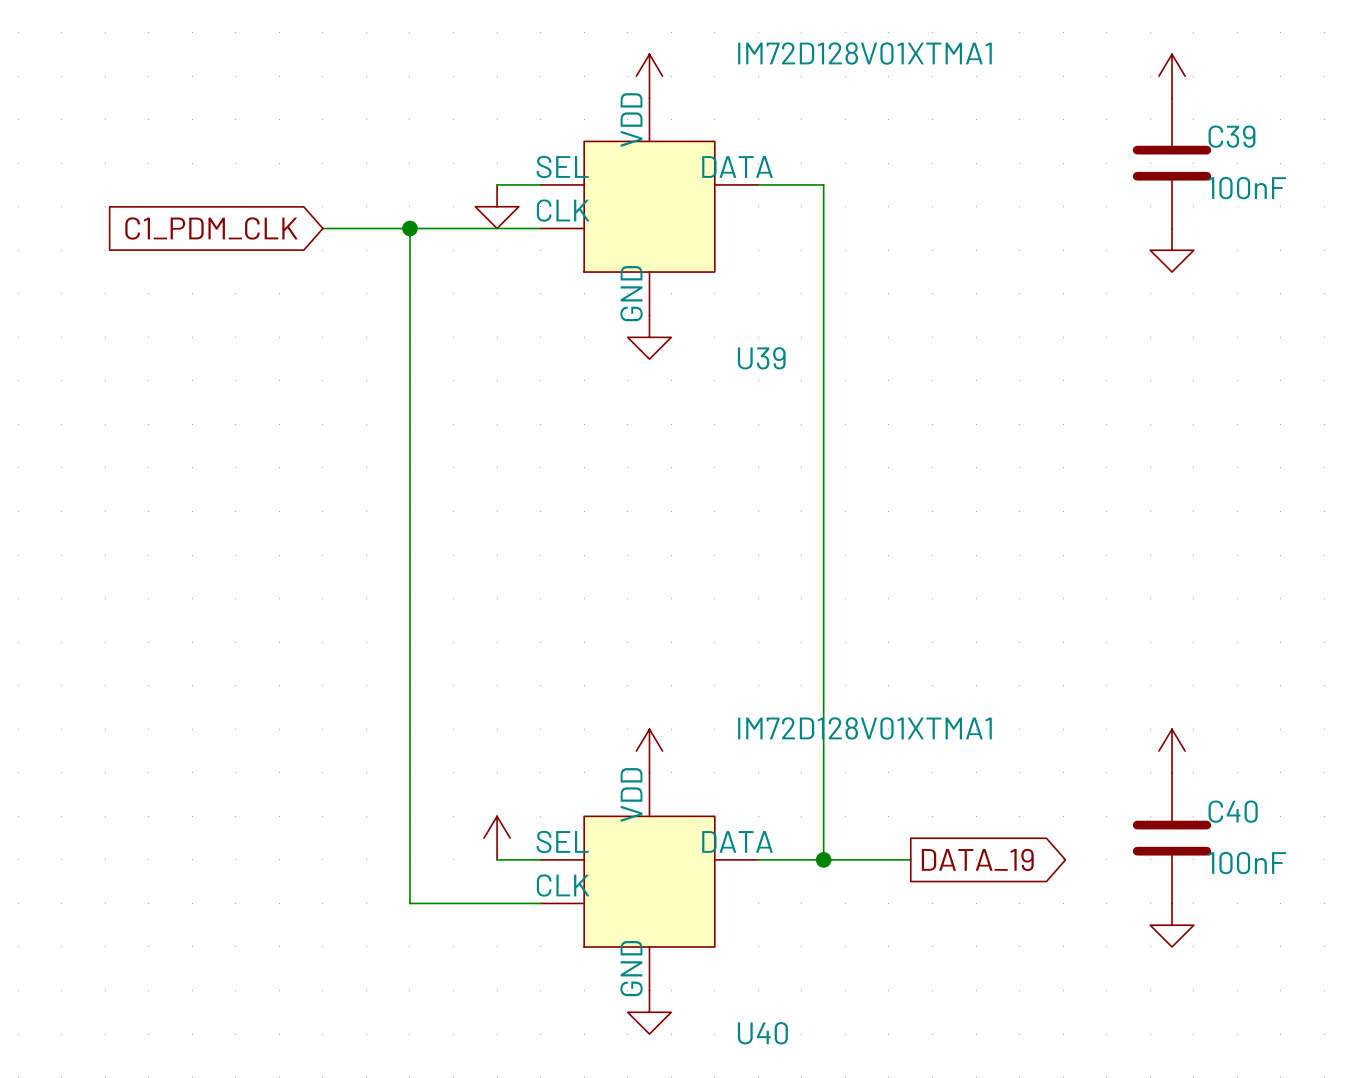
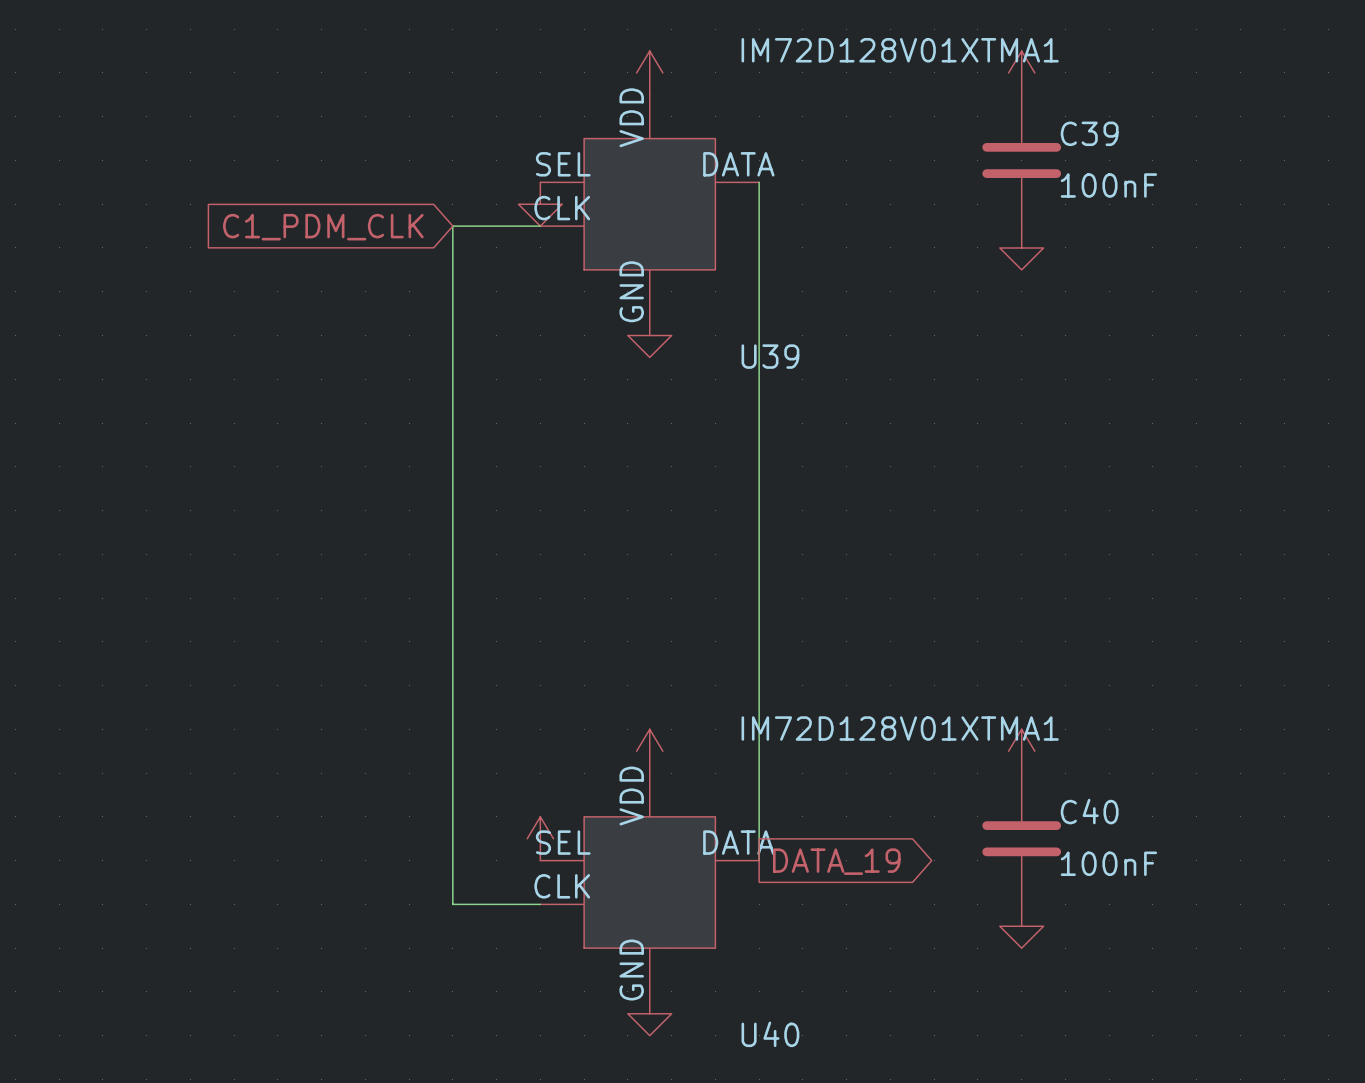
power symbol position: (1172, 76) -> (1021, 72)
C39 position: (1172, 163) -> (1021, 160)
wire: (497, 184) (540, 184) -> none
wire: (758, 184) (823, 184) (823, 859) -> (759, 182) (759, 860)
power symbol position: (497, 206) -> (540, 204)
global label position: C1_PDM_CLK (211, 228) -> C1_PDM_CLK (323, 227)
wire: (322, 228) (453, 228) -> none
wire: (409, 228) (409, 903) (453, 903) -> (452, 226) (452, 904)
junction: (409, 228) -> none
power symbol position: (1172, 250) -> (1021, 247)
power symbol position: (1172, 751) -> (1021, 751)
power symbol position: (497, 838) -> (540, 838)
C40 position: (1172, 838) -> (1021, 838)
wire: (497, 859) (540, 859) -> none
wire: (758, 859) (910, 859) -> none
junction: (823, 859) -> none
global label position: DATA_19 (977, 859) -> DATA_19 (836, 861)
power symbol position: (1172, 925) -> (1021, 926)

